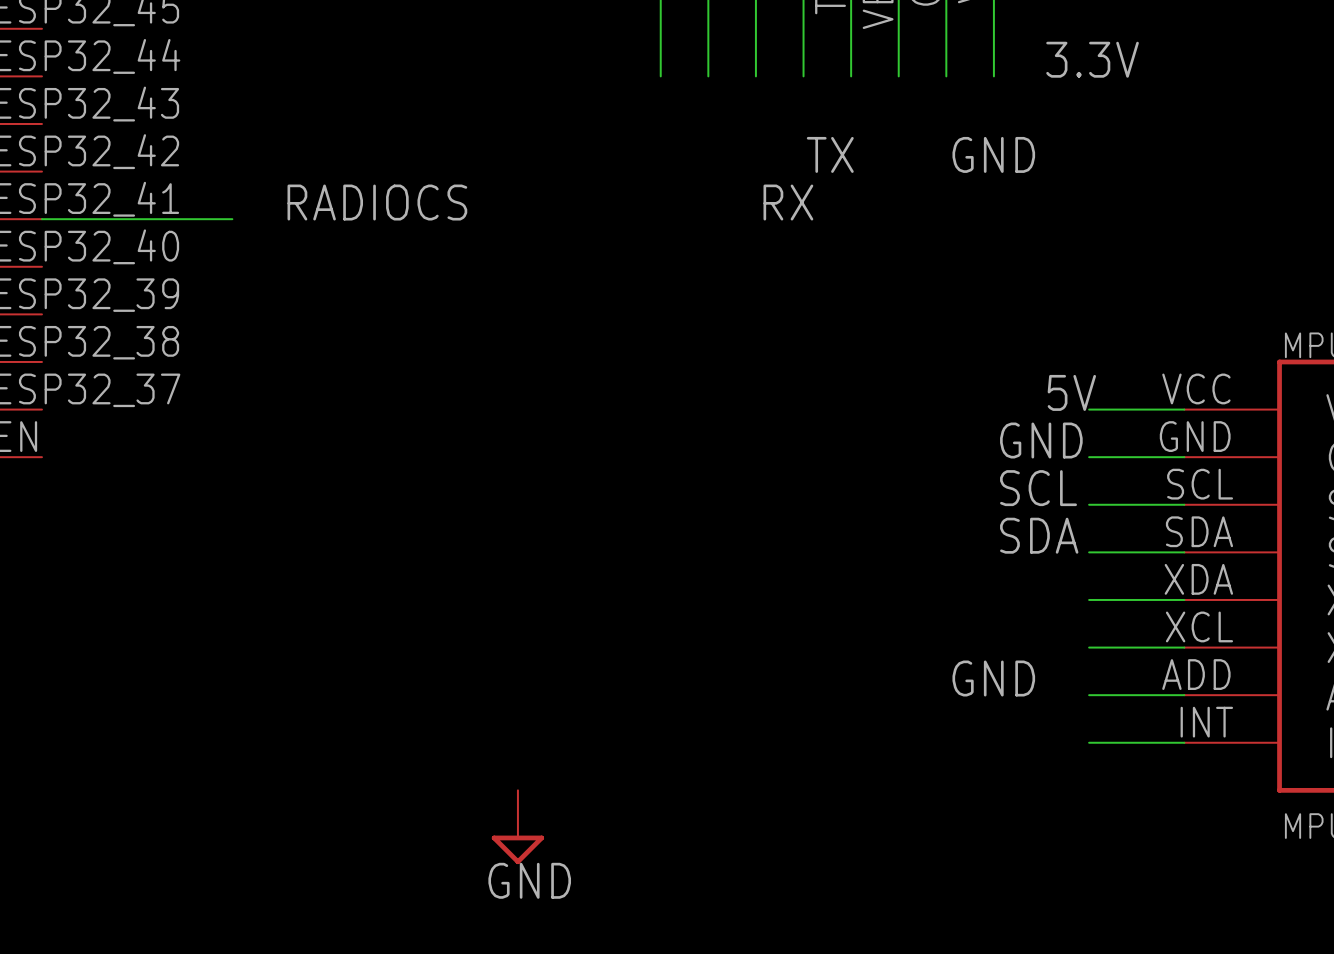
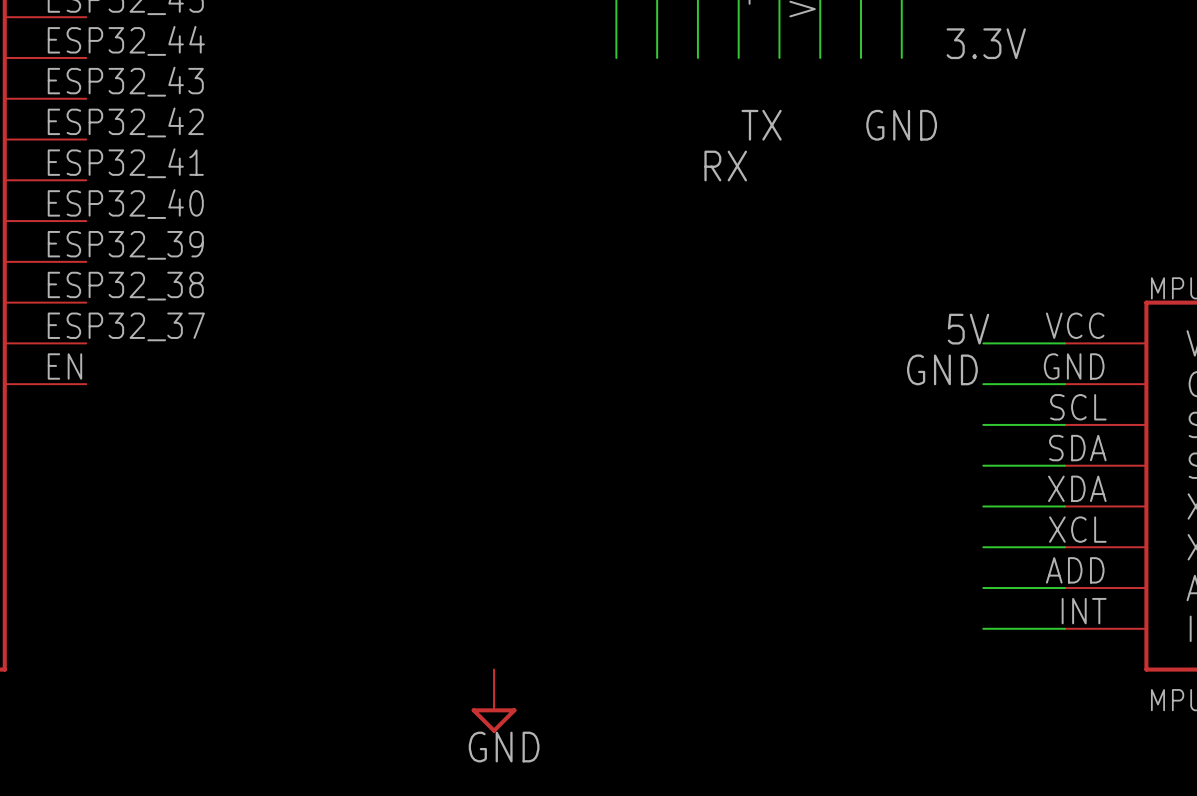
label: RADIOCS (377, 202) -> none
wire: (41, 219) (232, 219) -> none
label: SCL (1038, 488) -> none
label: SDA (1039, 535) -> none
label: GND (993, 678) -> none

